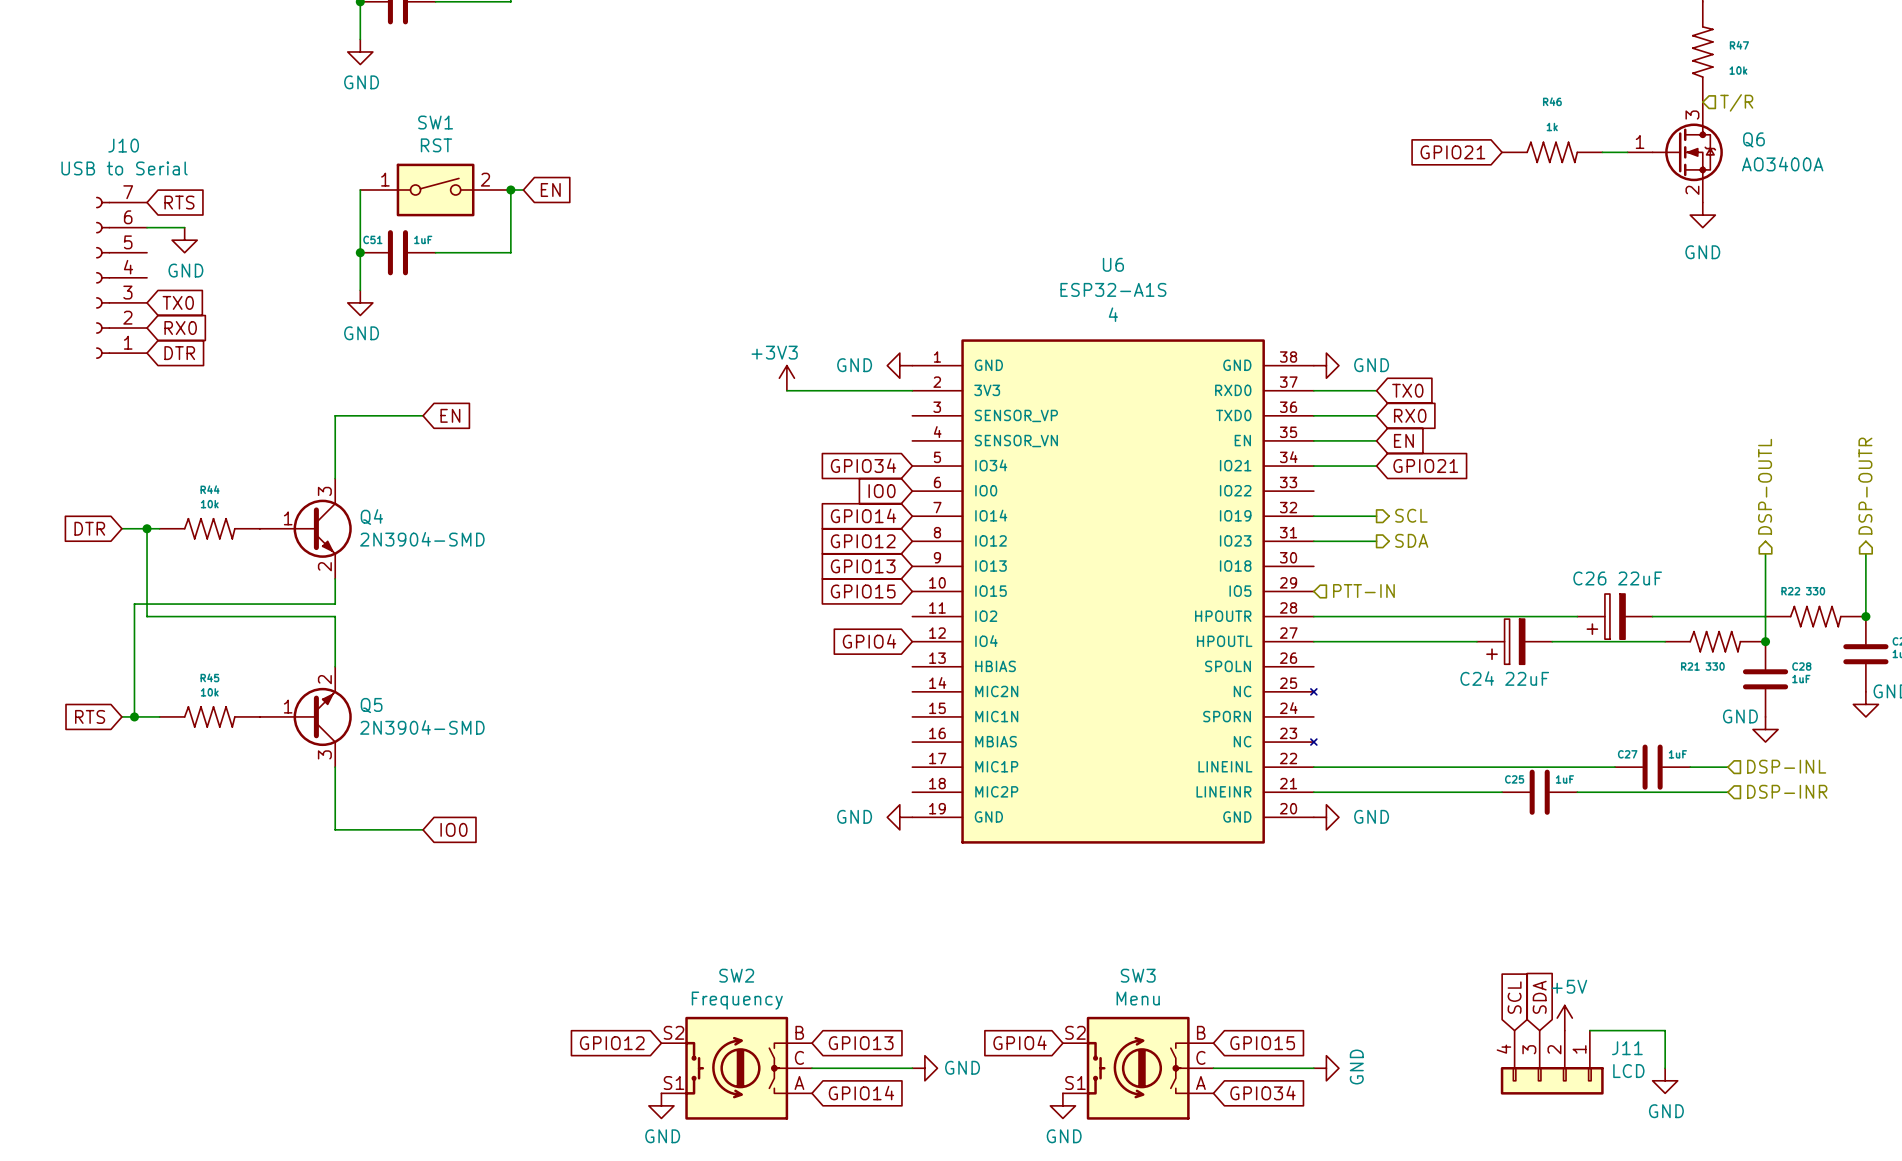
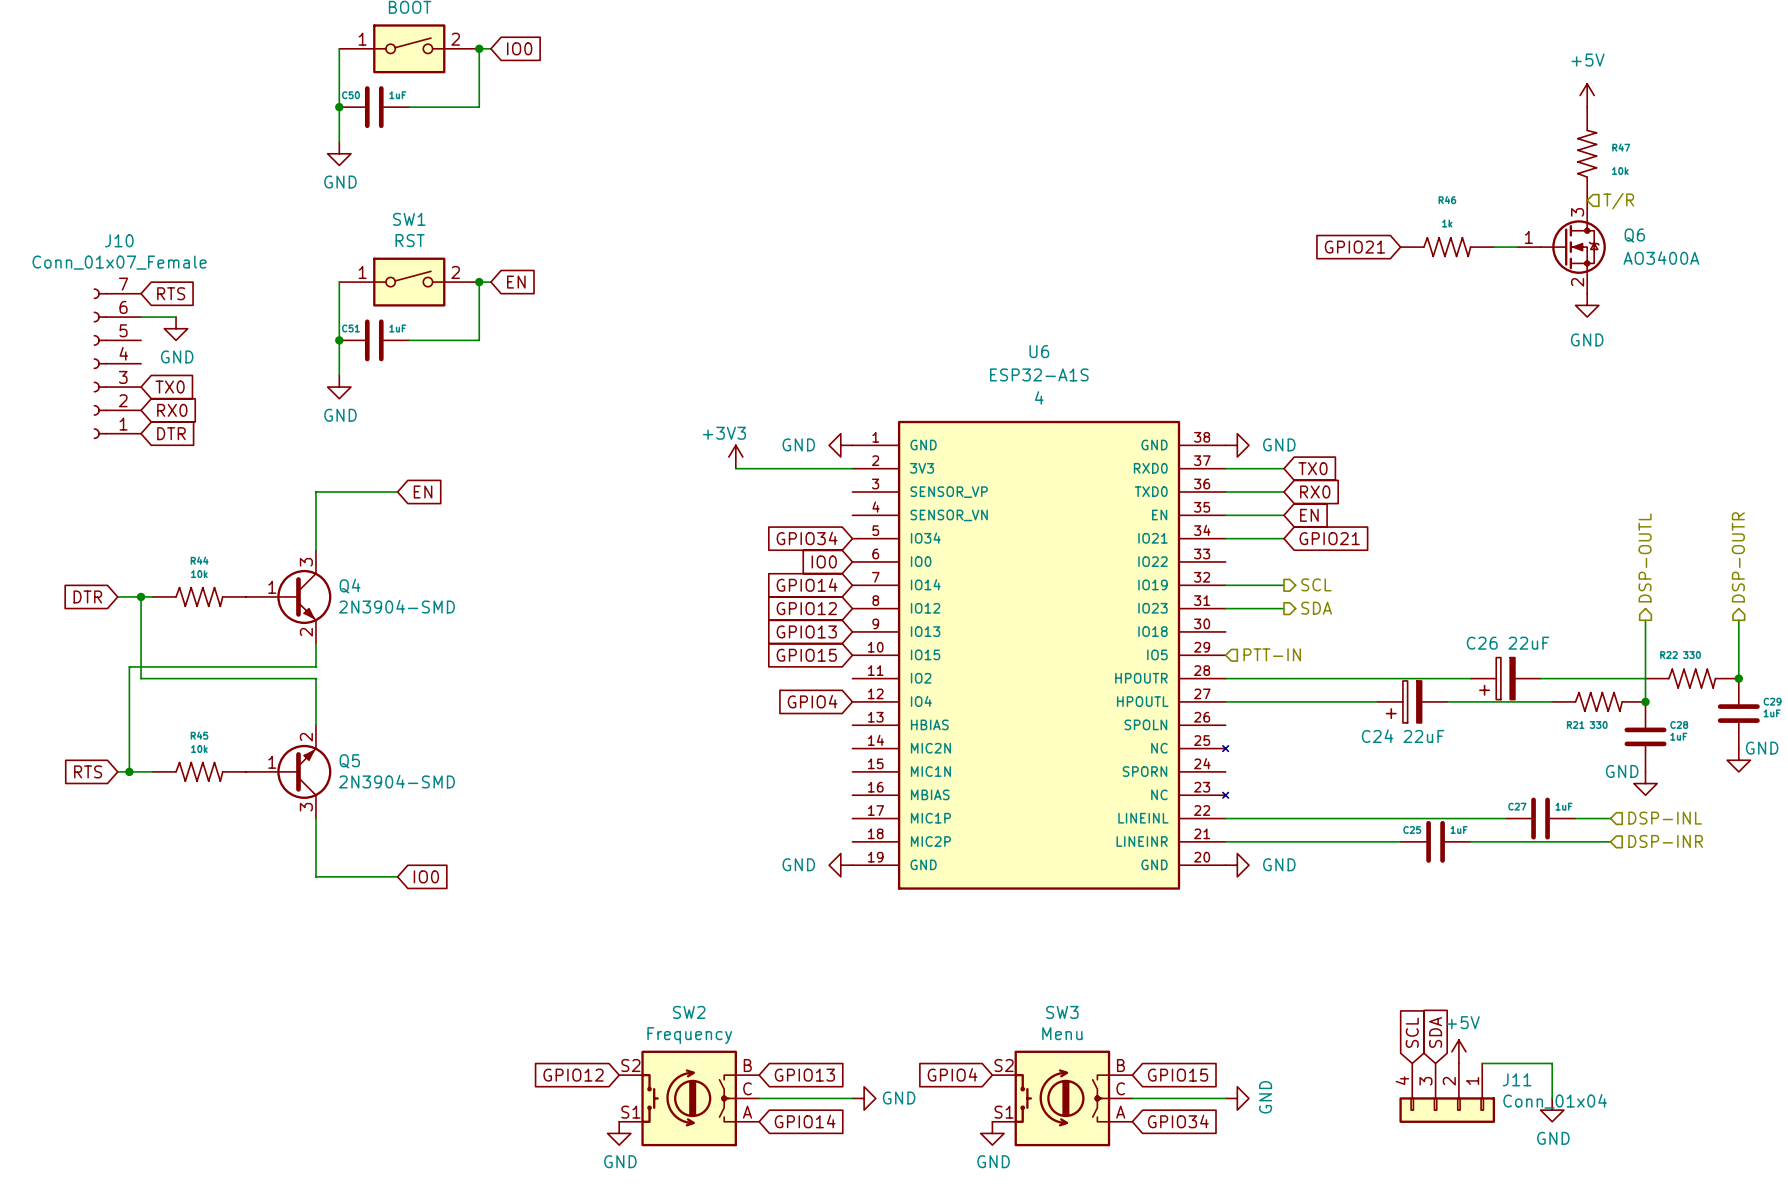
J10 value: USB to Serial (124, 168) -> Conn_01x07_Female (119, 262)
J11 value: LCD (1628, 1071) -> Conn_01x04 (1555, 1101)

